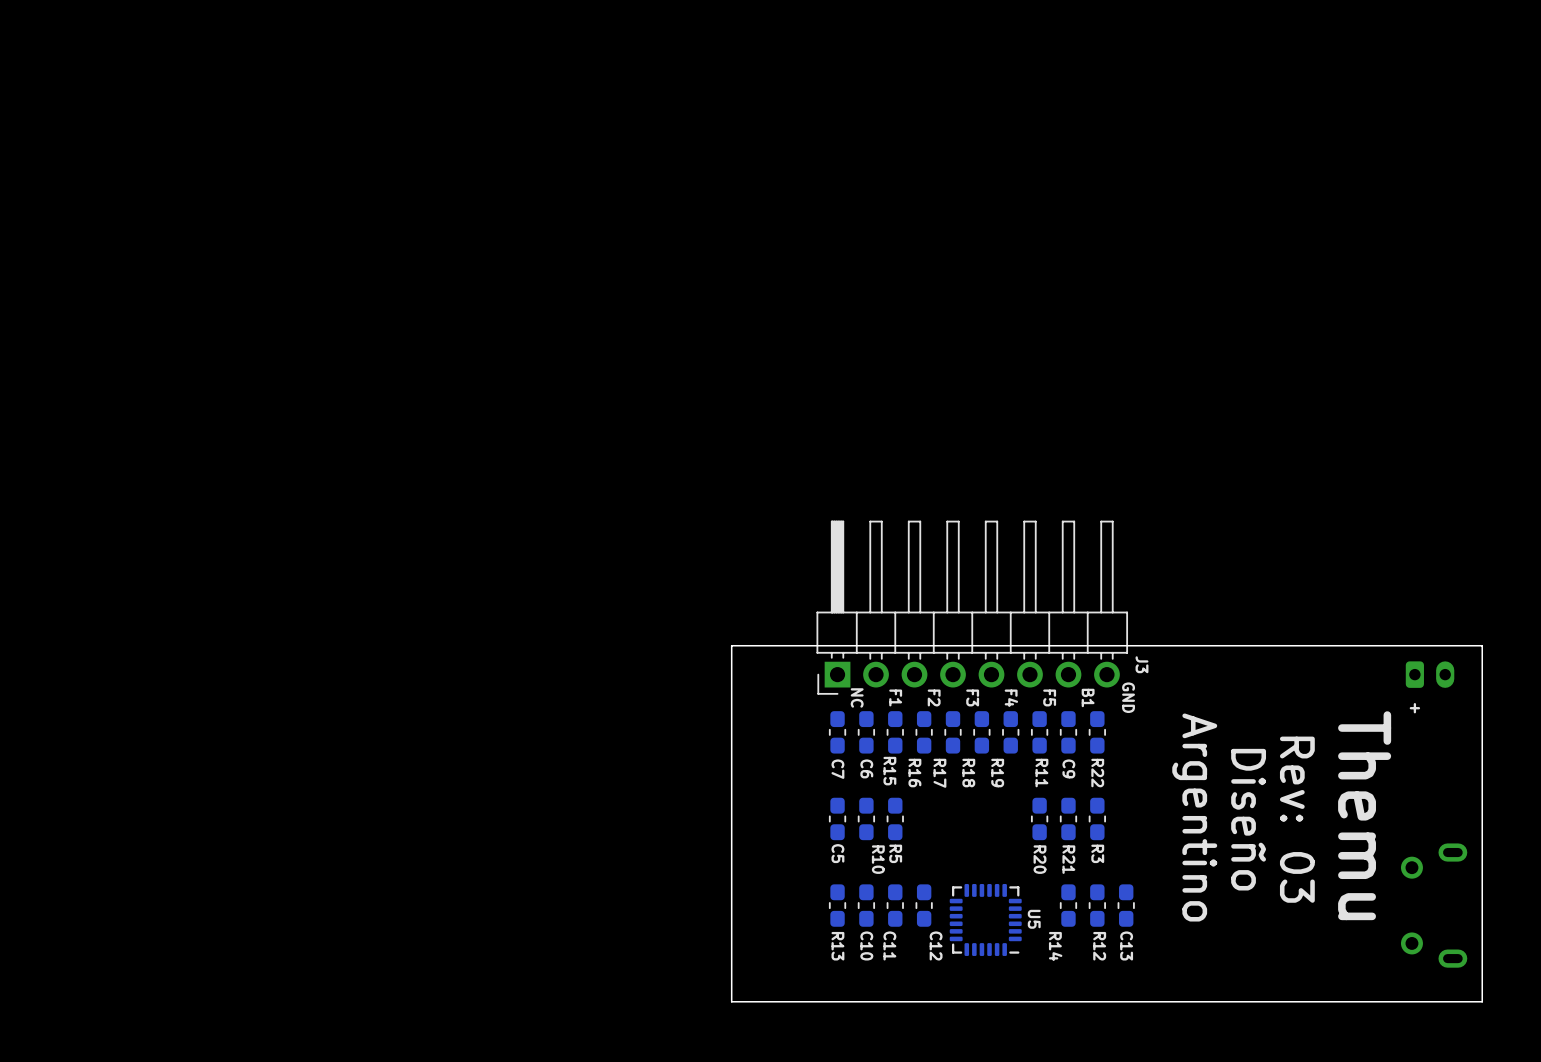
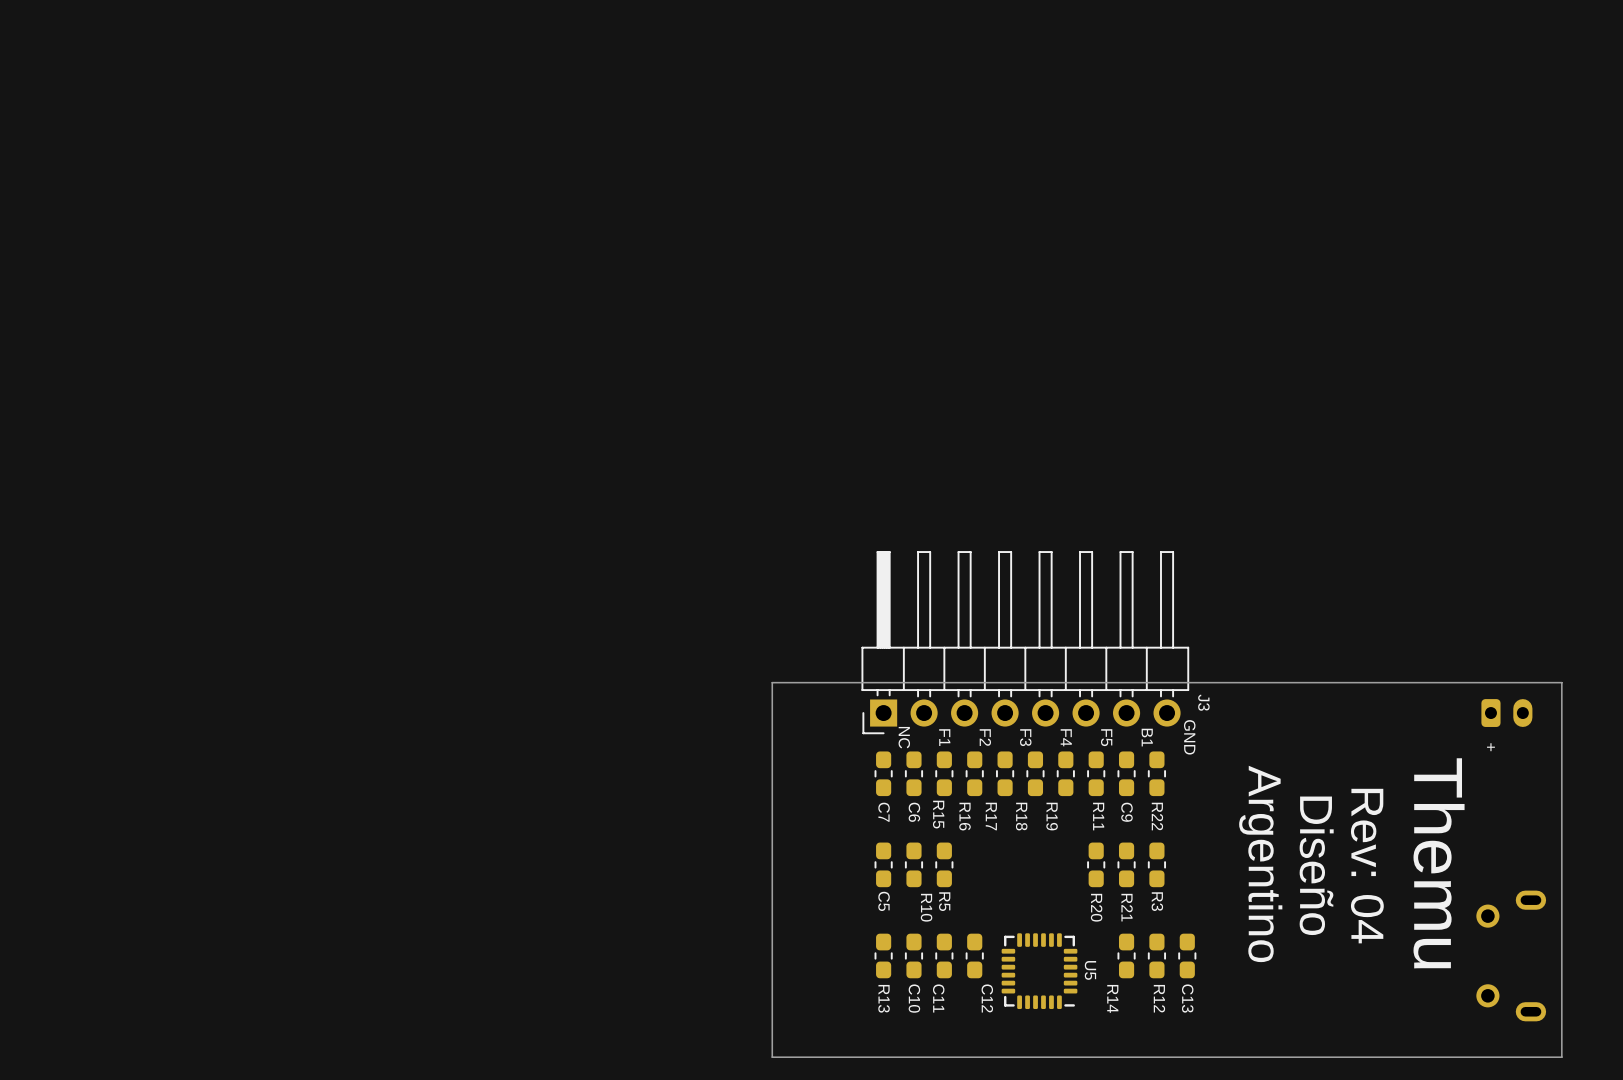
text: Rev: 03 (1297, 819) -> Rev: 04 (1367, 866)

